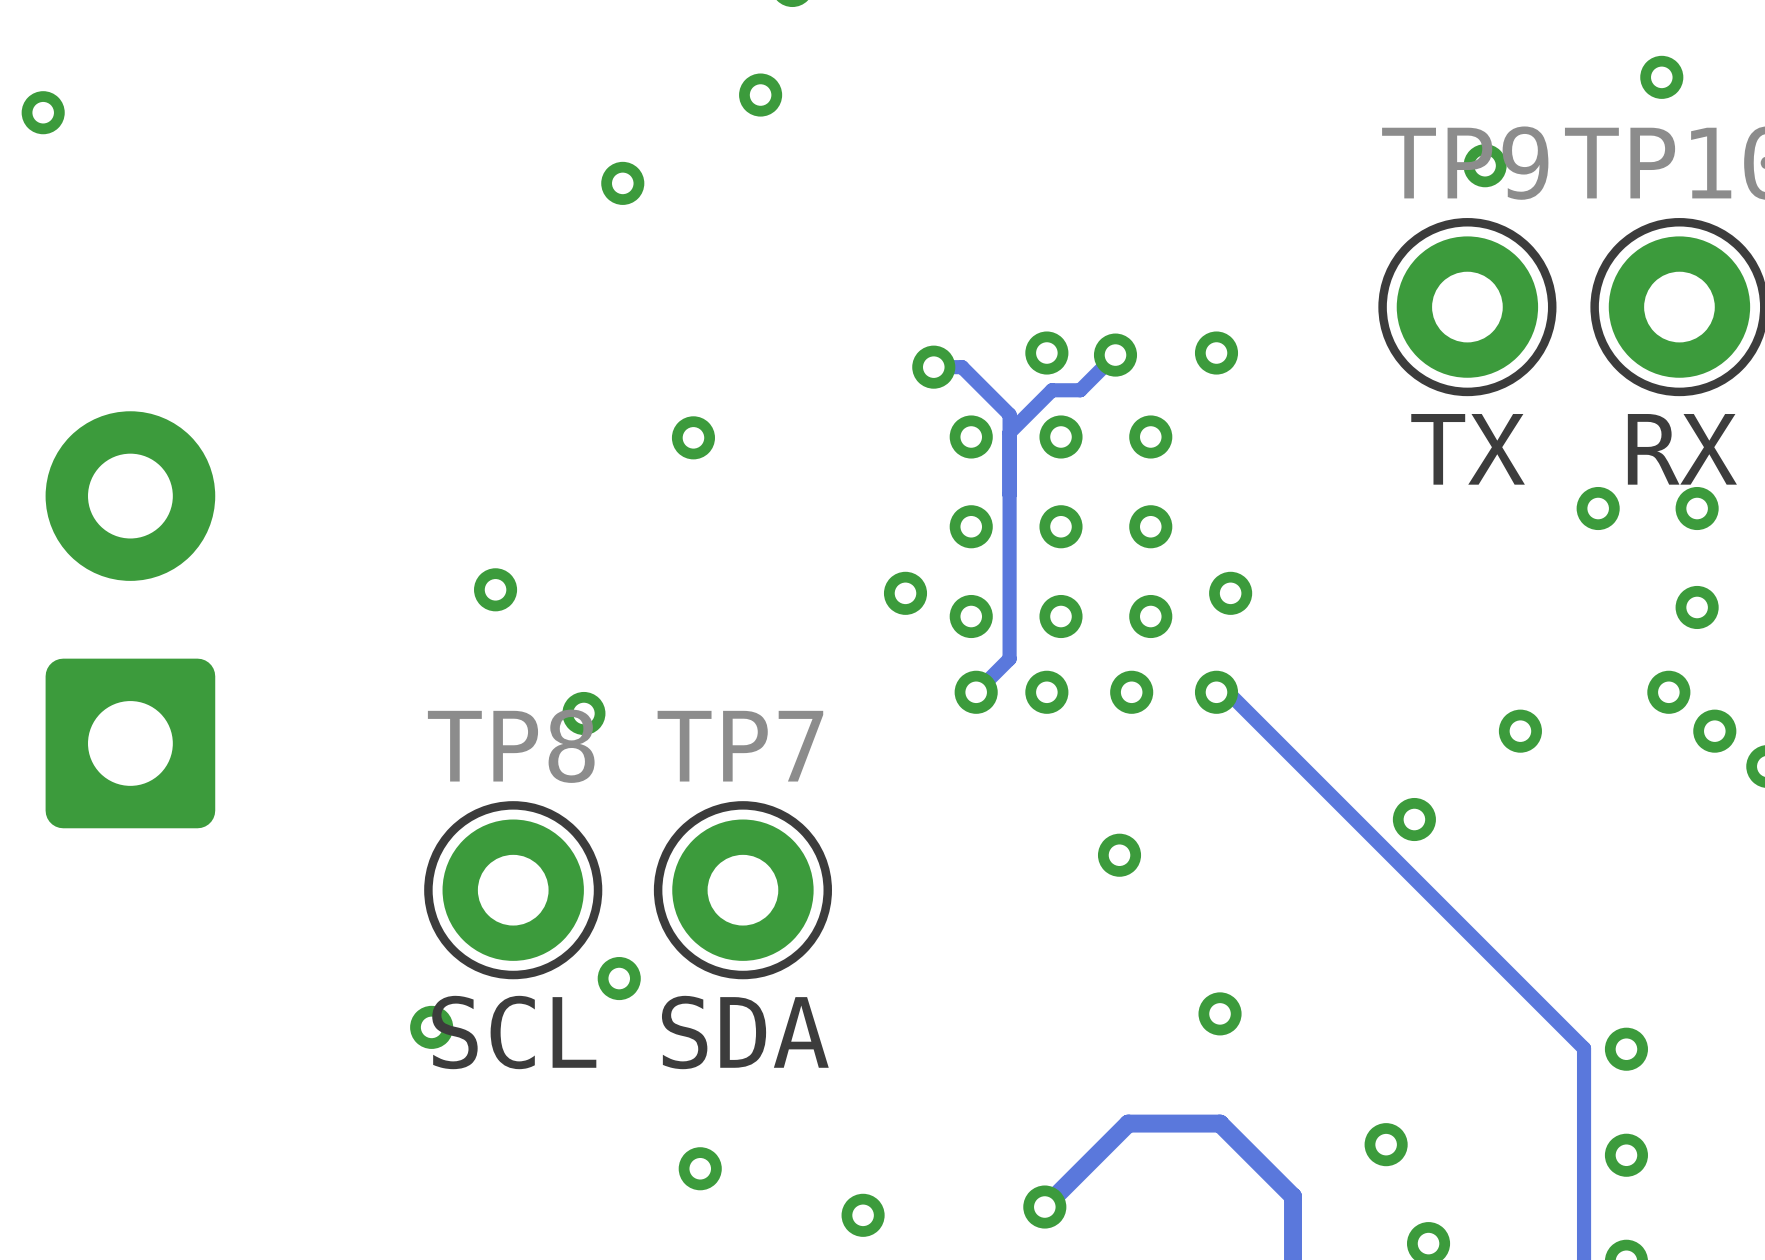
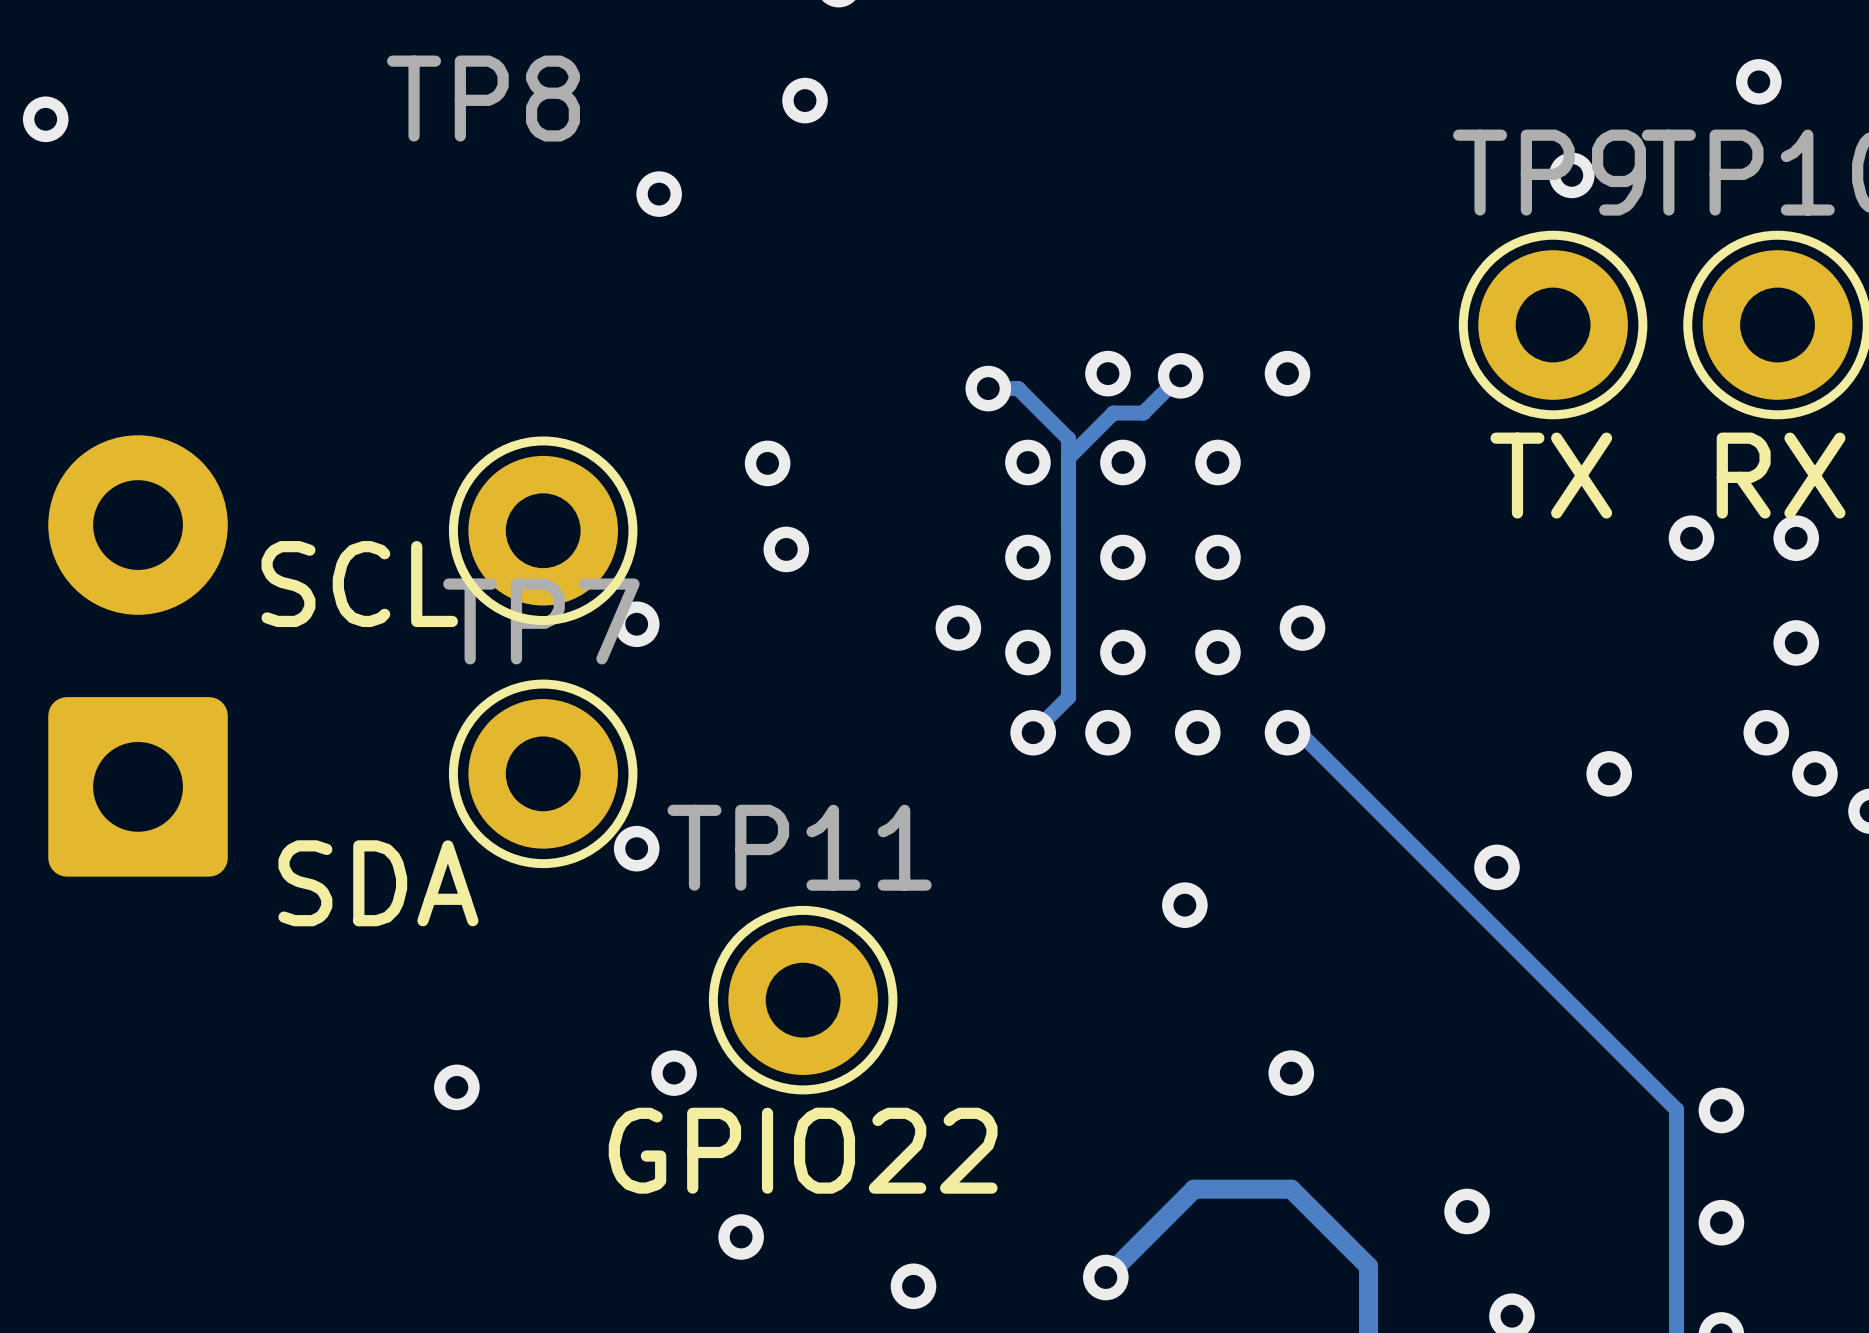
via position: (693, 437) -> (767, 463)
via: none -> (786, 549)
via: (495, 589) -> none
via: none -> (636, 624)
via: (583, 713) -> none
TP8 name position: TP8 (511, 746) -> TP8 (483, 98)
via: none -> (636, 848)
TP8 position: (513, 890) -> (543, 530)
TP7 position: (742, 890) -> (543, 773)
TP11: none -> GPIO22 (803, 1000)
via position: (619, 978) -> (674, 1073)
TP8 value position: SCL (514, 1032) -> SCL (359, 584)
TP7 value position: SDA (745, 1032) -> SDA (378, 883)

